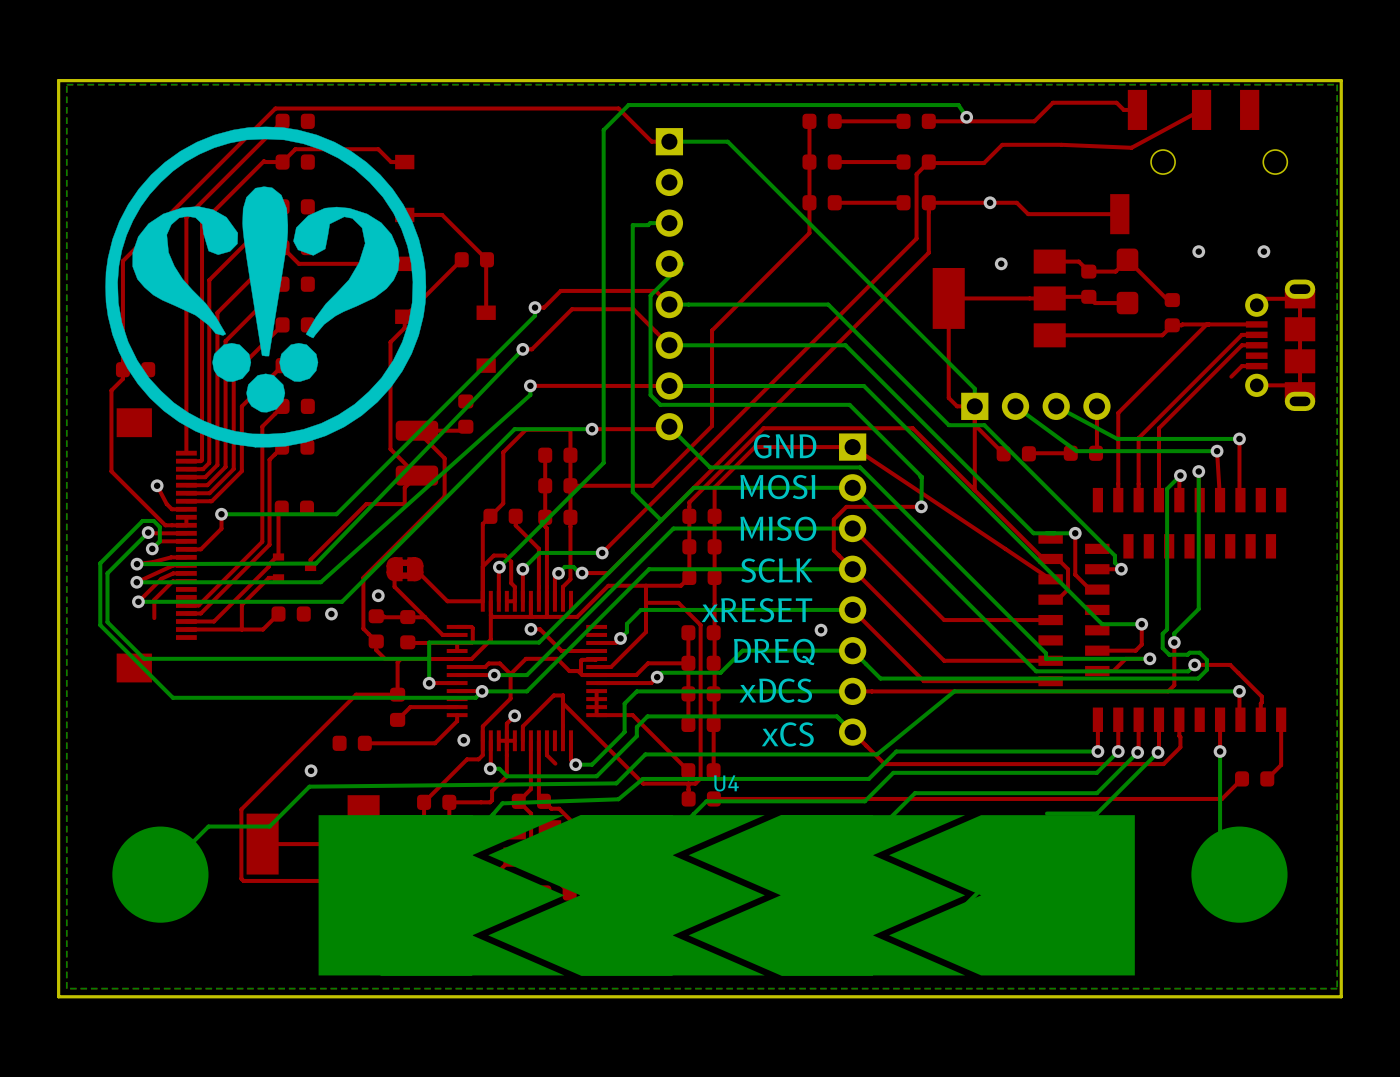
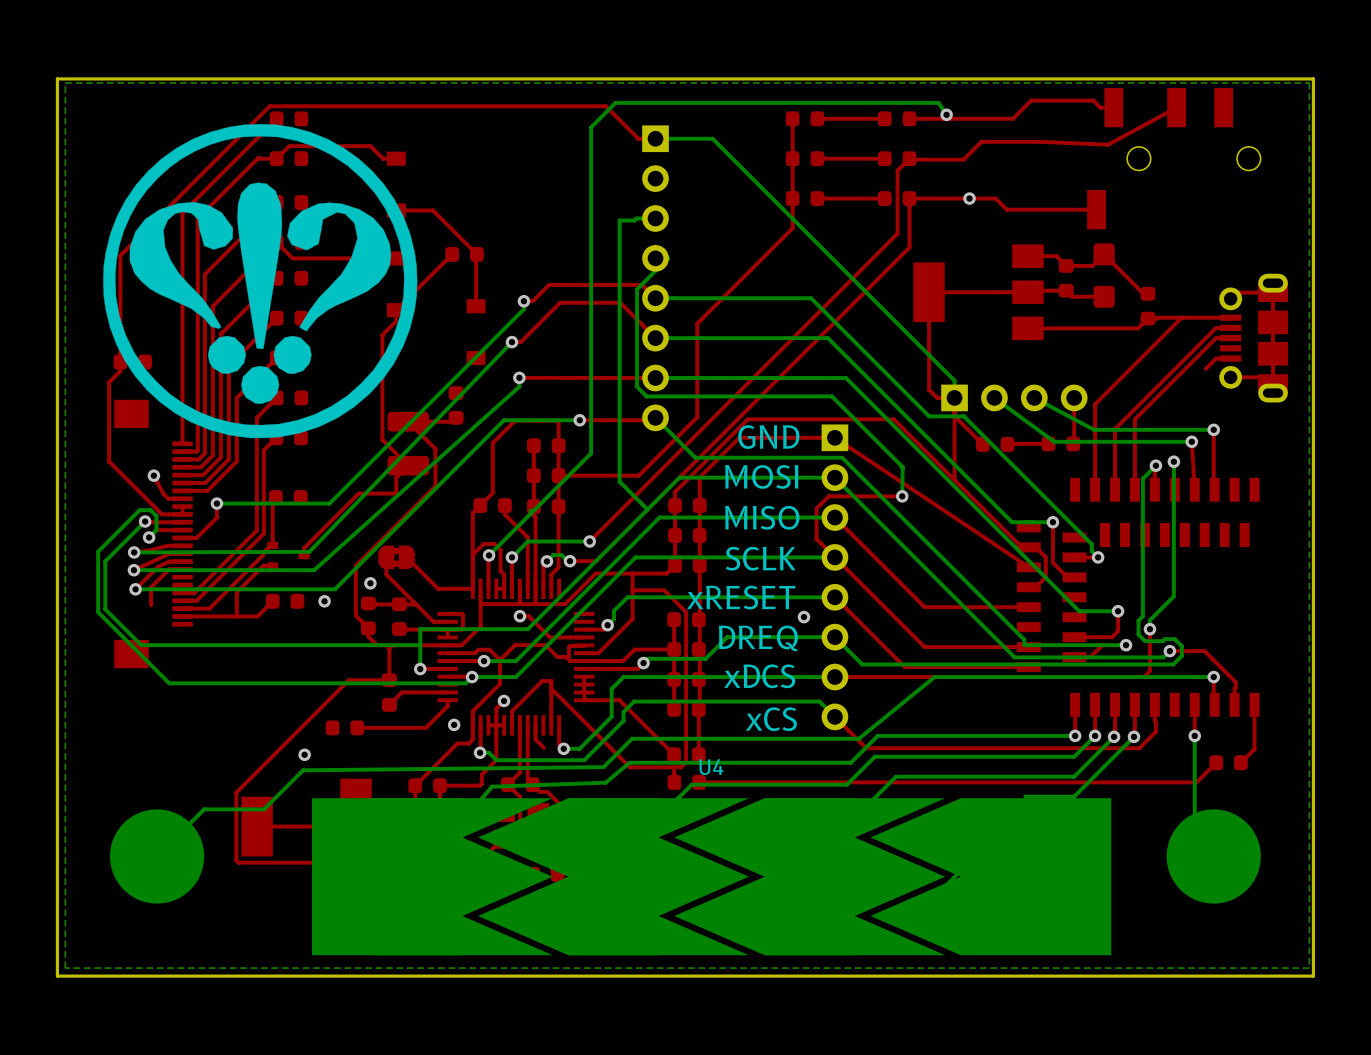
via: (1198, 251) -> none
via: (1263, 251) -> none
via: (1001, 263) -> none

